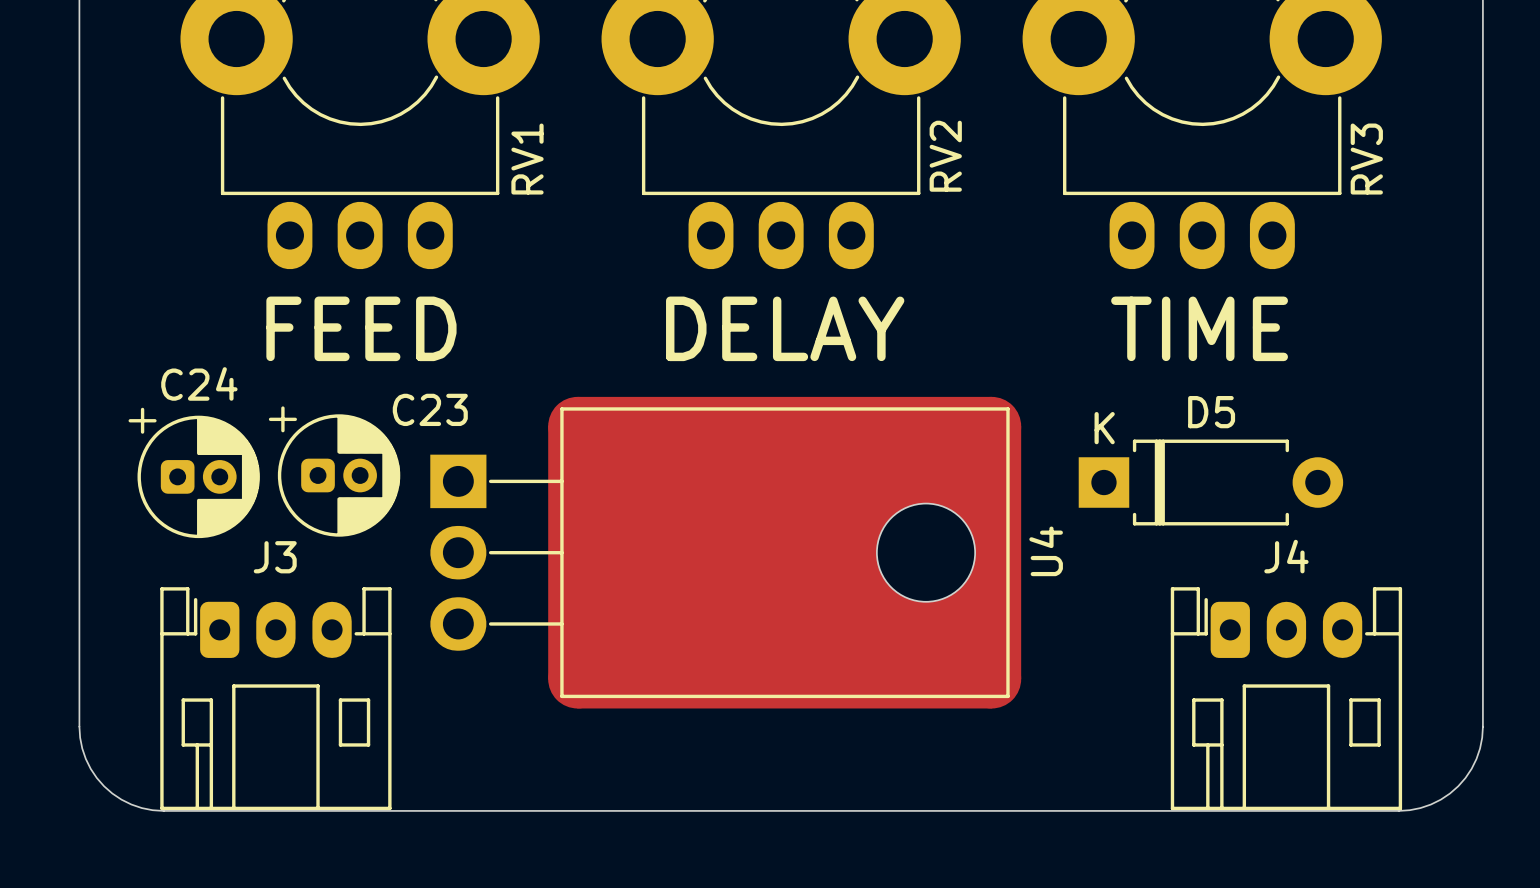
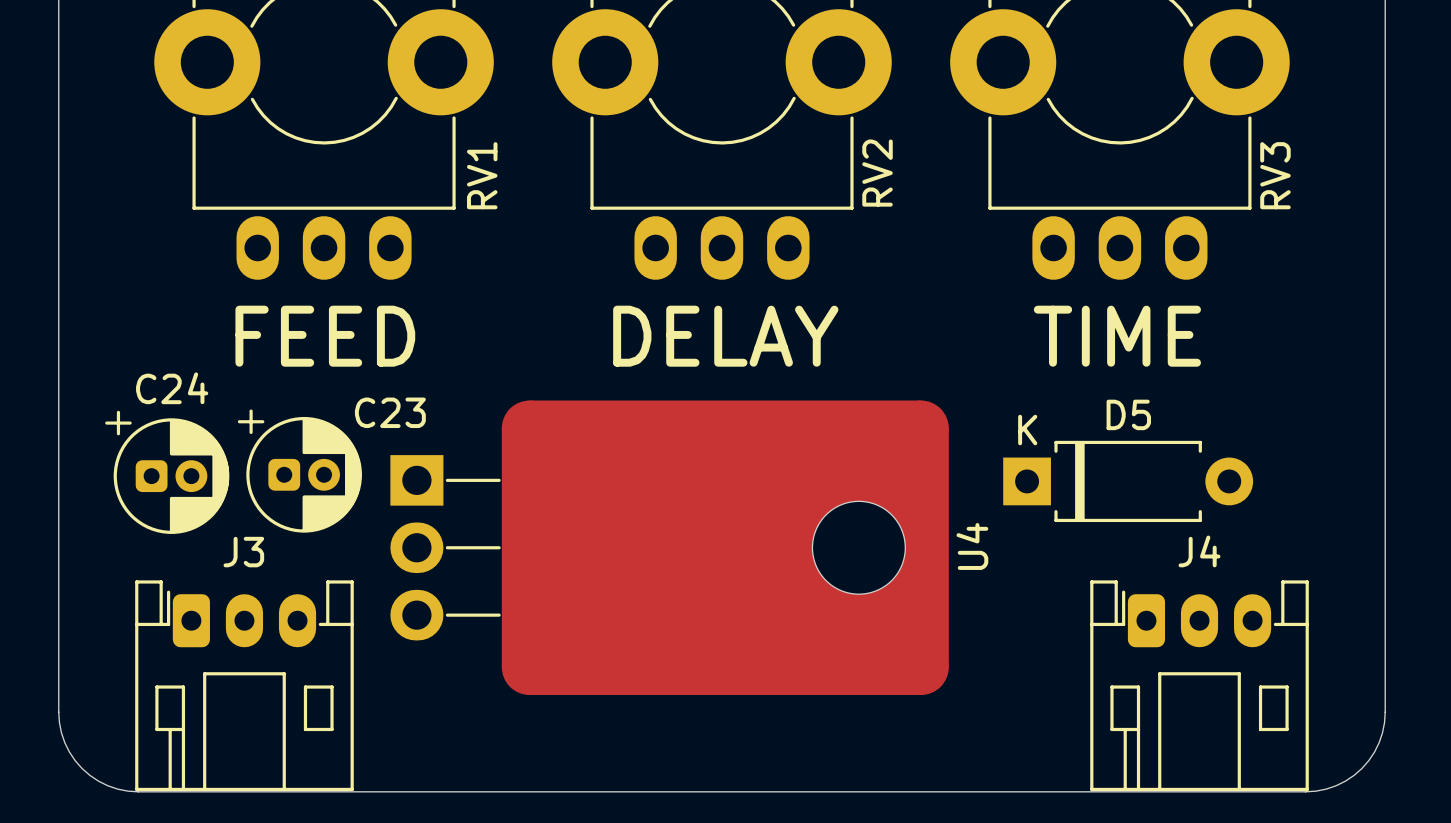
U4 footprint: [430, 396, 1022, 709] -> [390, 400, 949, 695]

